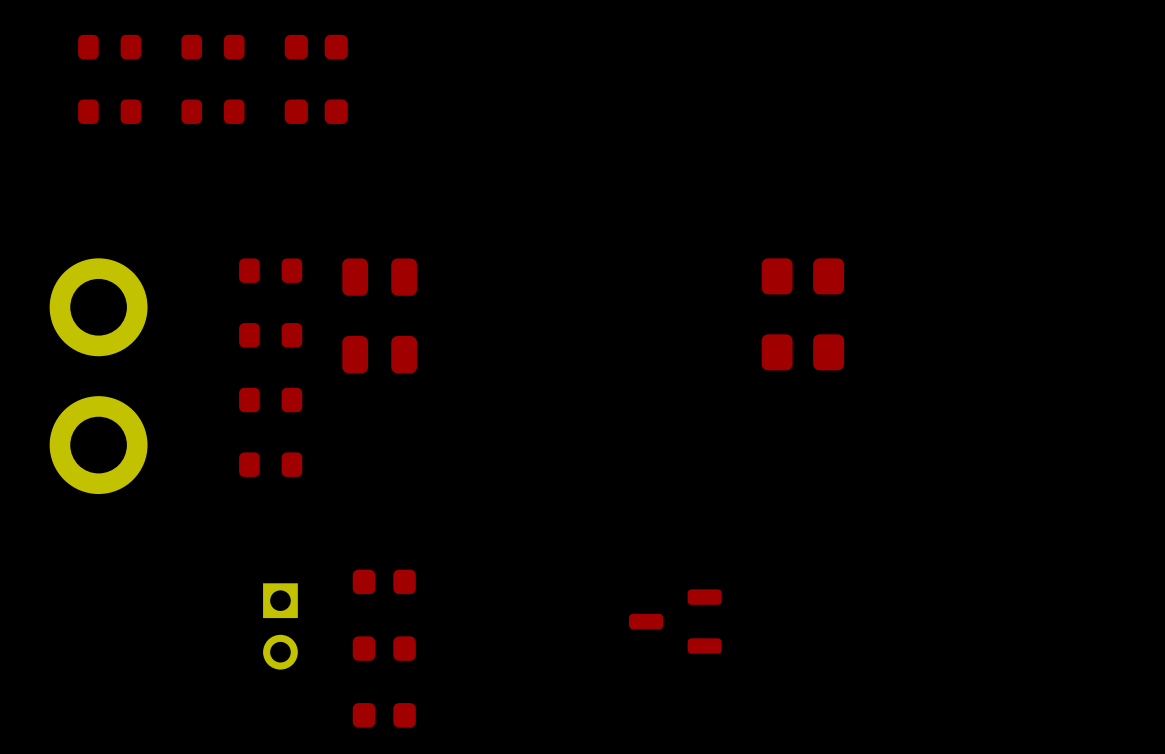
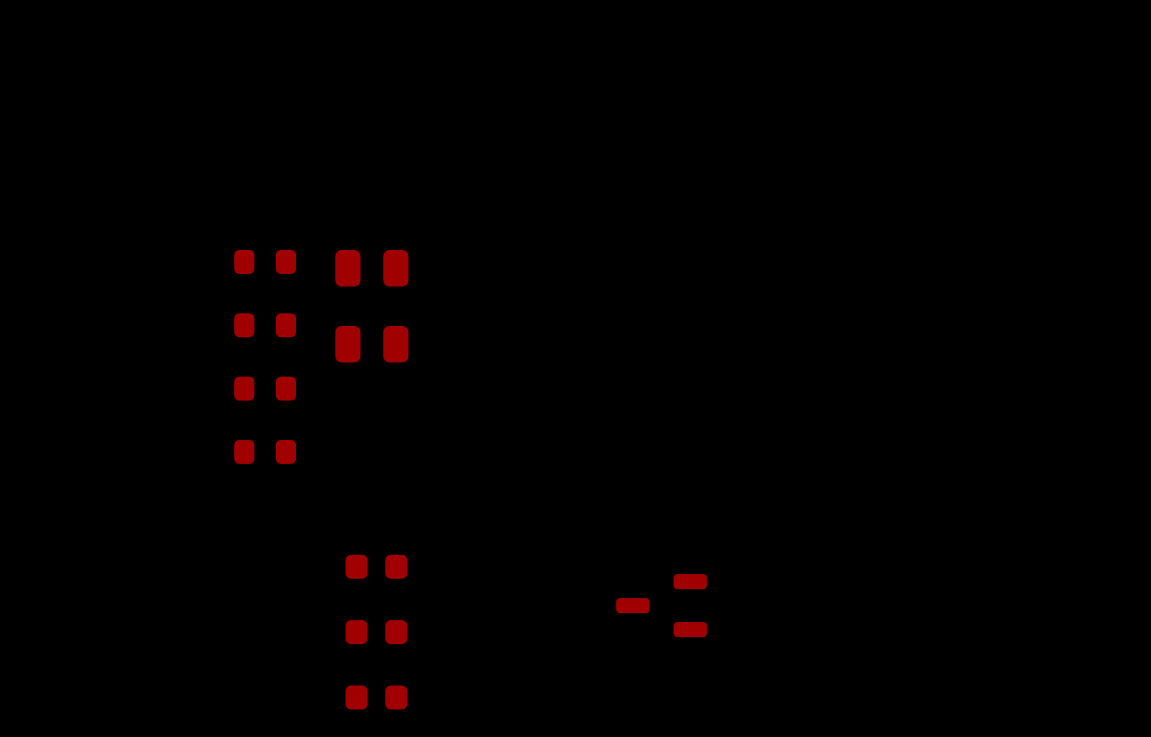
part: (109, 47) -> none
part: (212, 47) -> none
part: (316, 47) -> none
part: (109, 111) -> none
part: (212, 111) -> none
part: (316, 111) -> none
part: (802, 276) -> none
part: (98, 307) -> none
part: (802, 352) -> none
part: (98, 445) -> none
part: (280, 626) -> none

